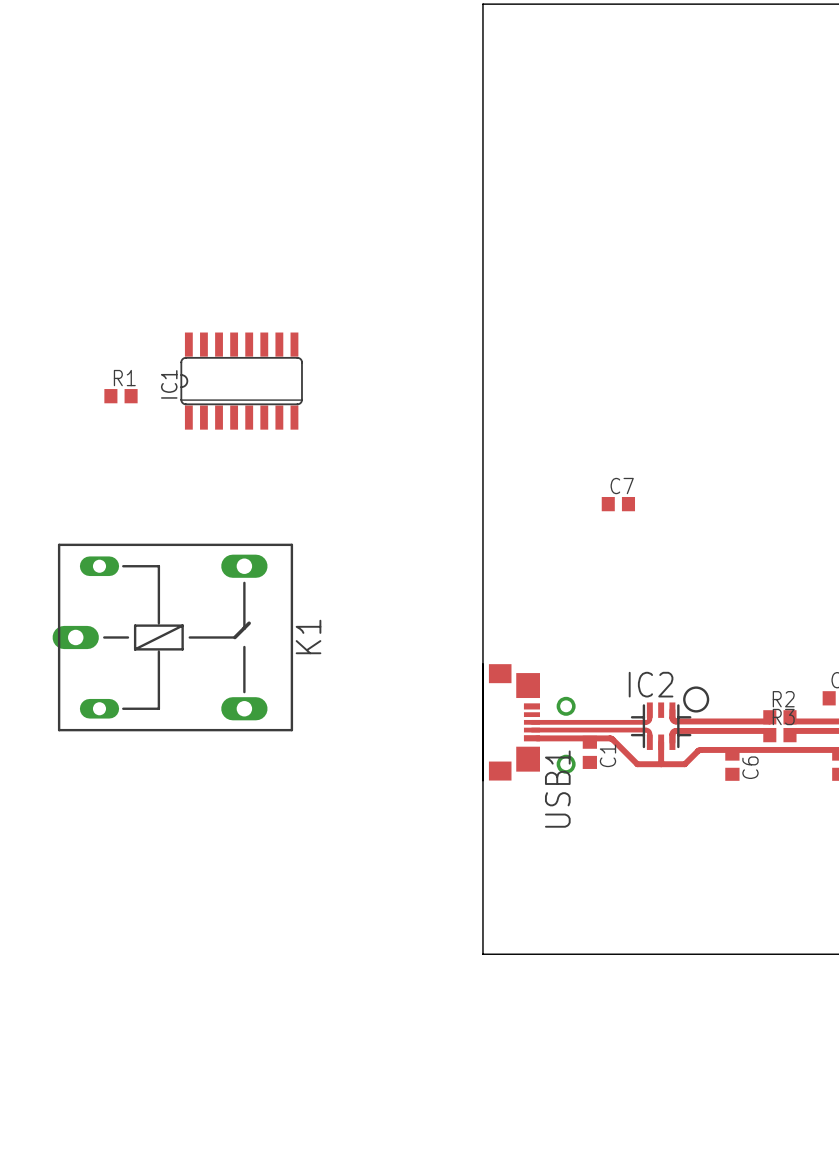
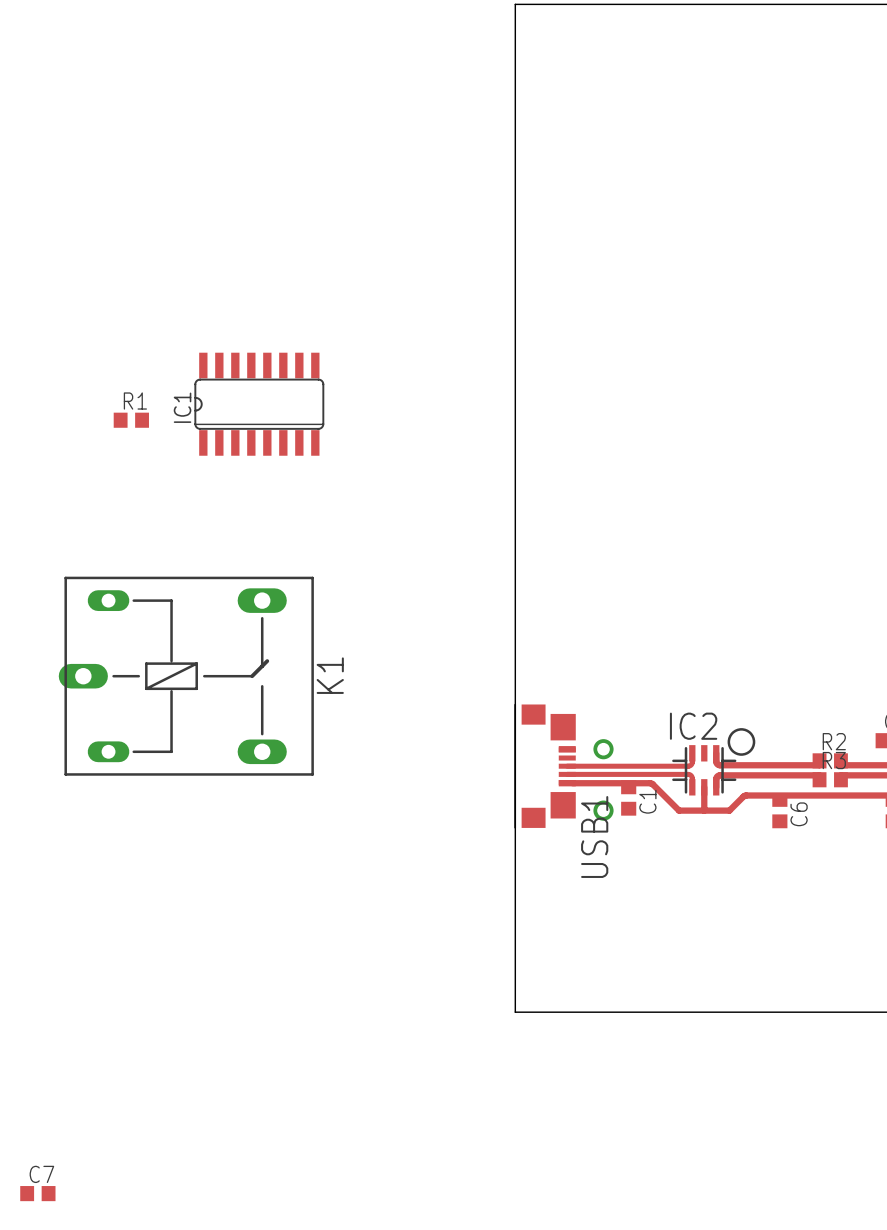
C7 position: (618, 504) -> (37, 1193)

